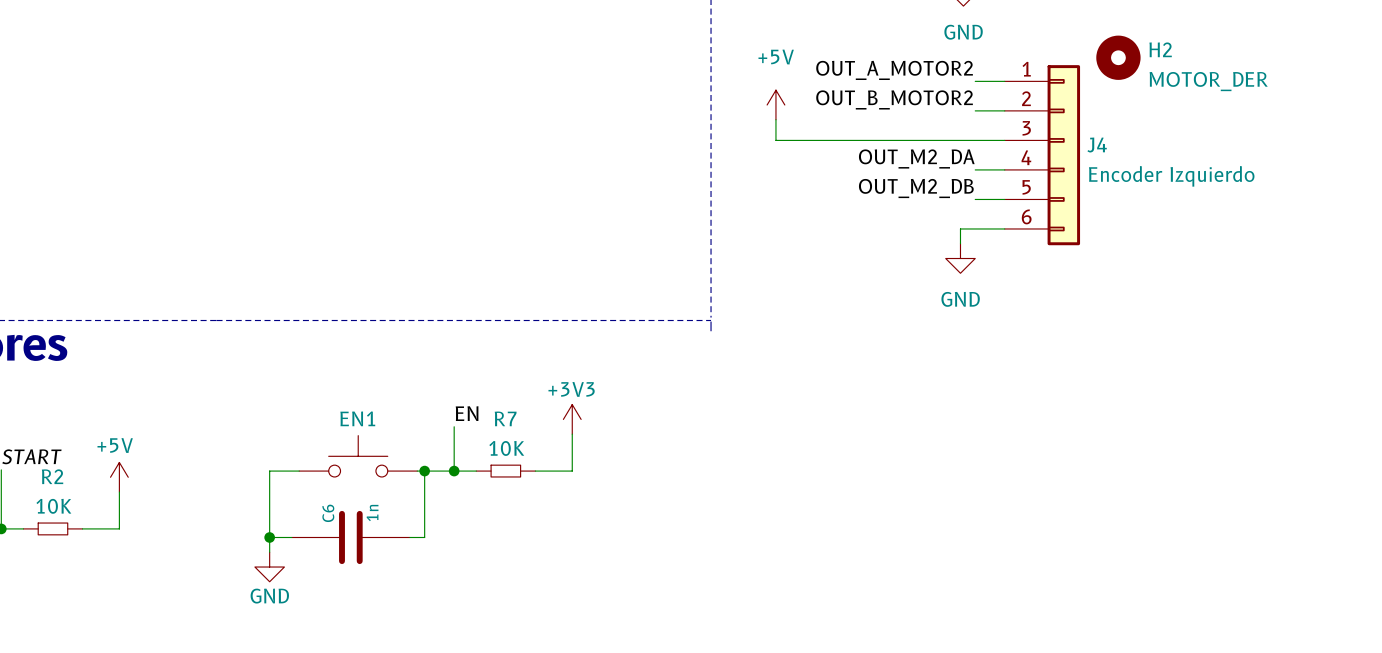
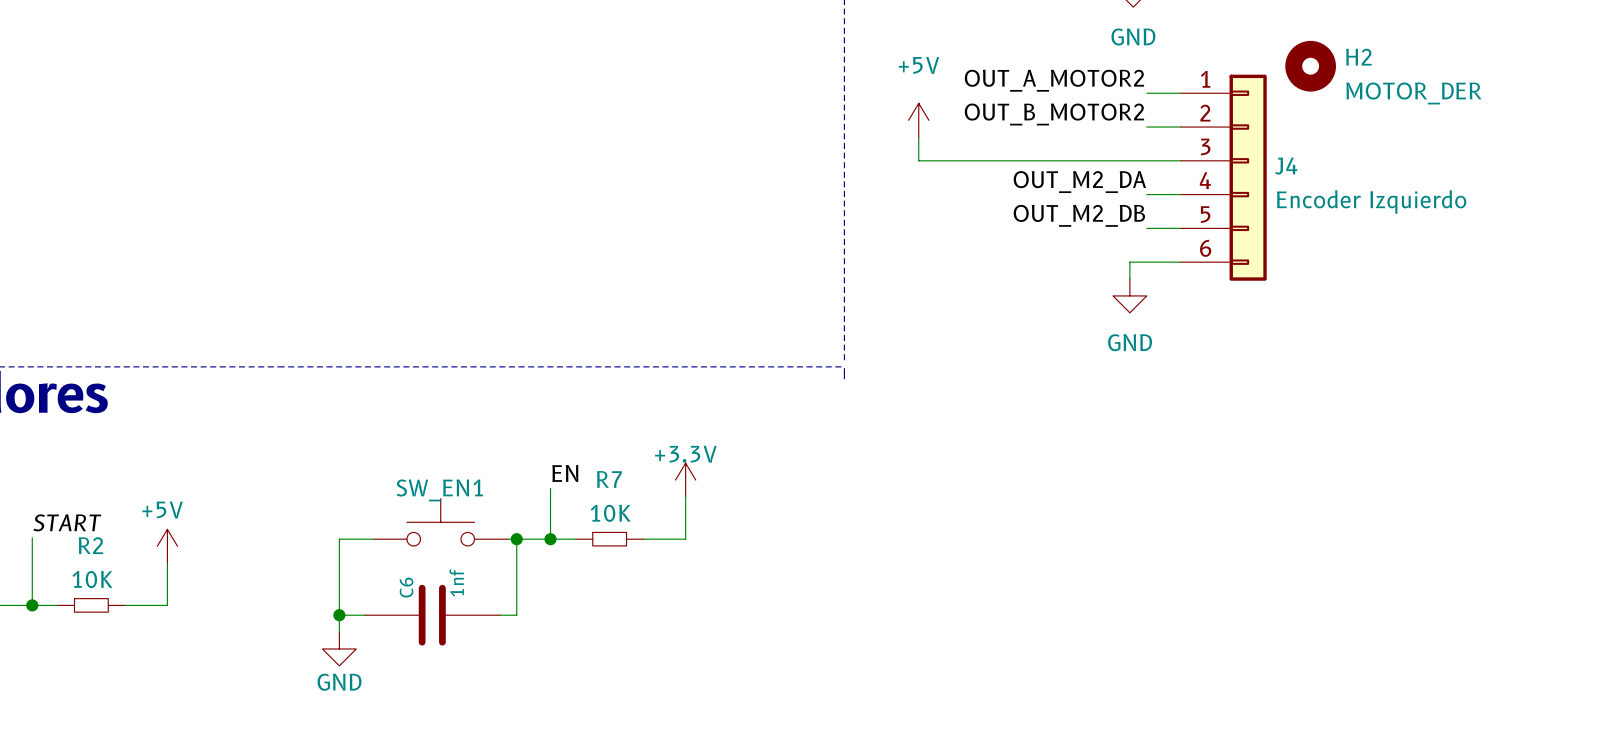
EN1 name: EN1 (357, 418) -> SW_EN1 (439, 490)
power symbol: +3V3 (572, 419) -> +3.3V (685, 480)
C6 value: 1n (372, 513) -> 1nf (456, 582)

